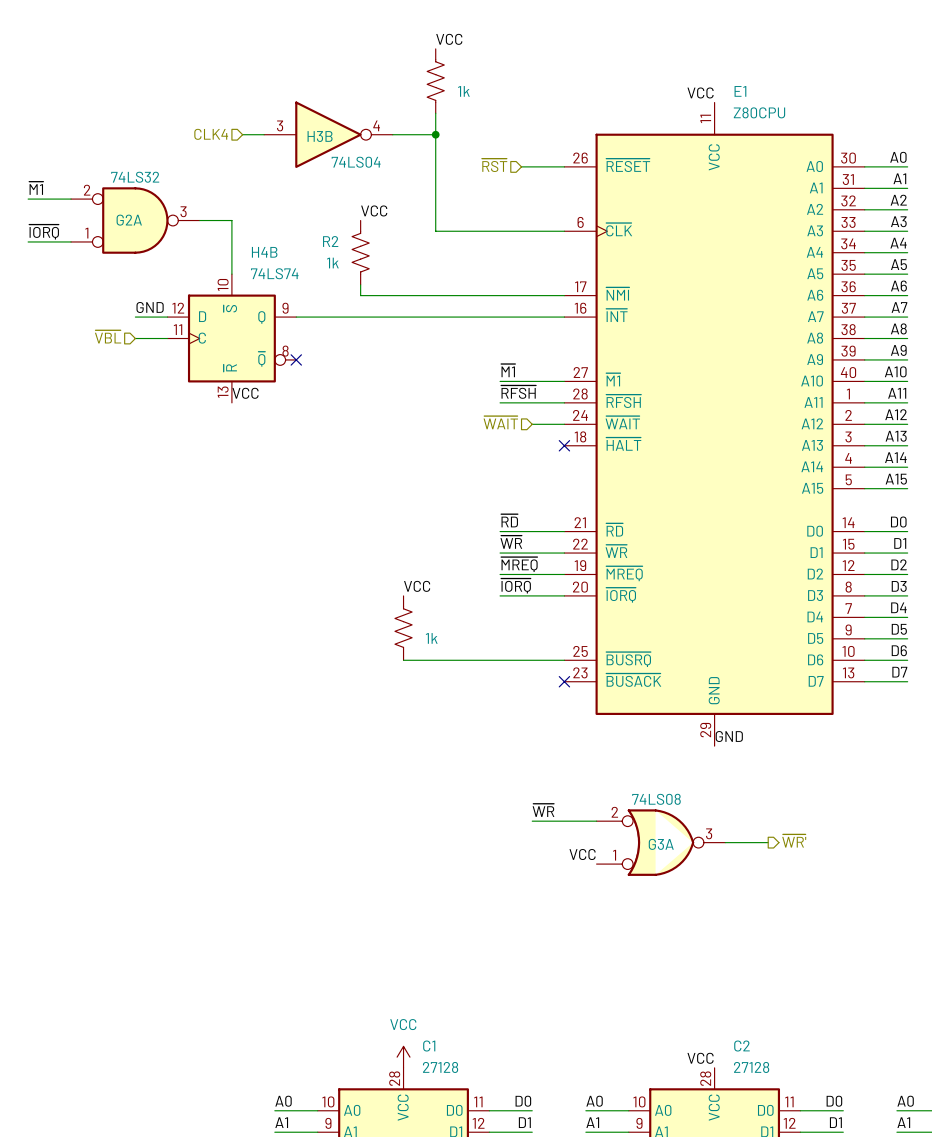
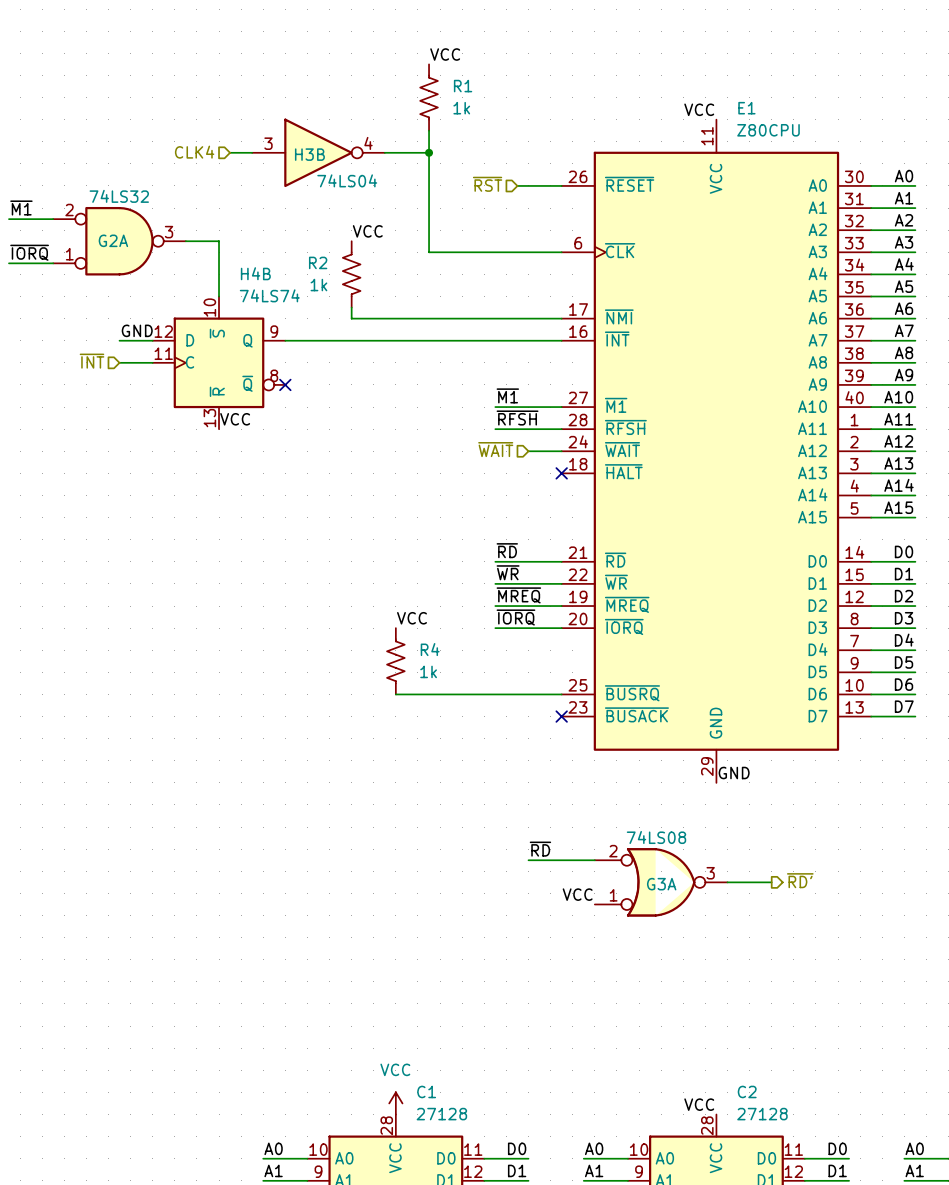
R1 name: none -> R1 (463, 86)
hierarchical label: ~{VBL} (108, 336) -> ~{INT} (92, 361)
R4 name: none -> R4 (430, 649)
label: ~{WR} (543, 810) -> ~{RD} (540, 849)
hierarchical label: ~{WR'} (794, 840) -> ~{RD'} (800, 880)

